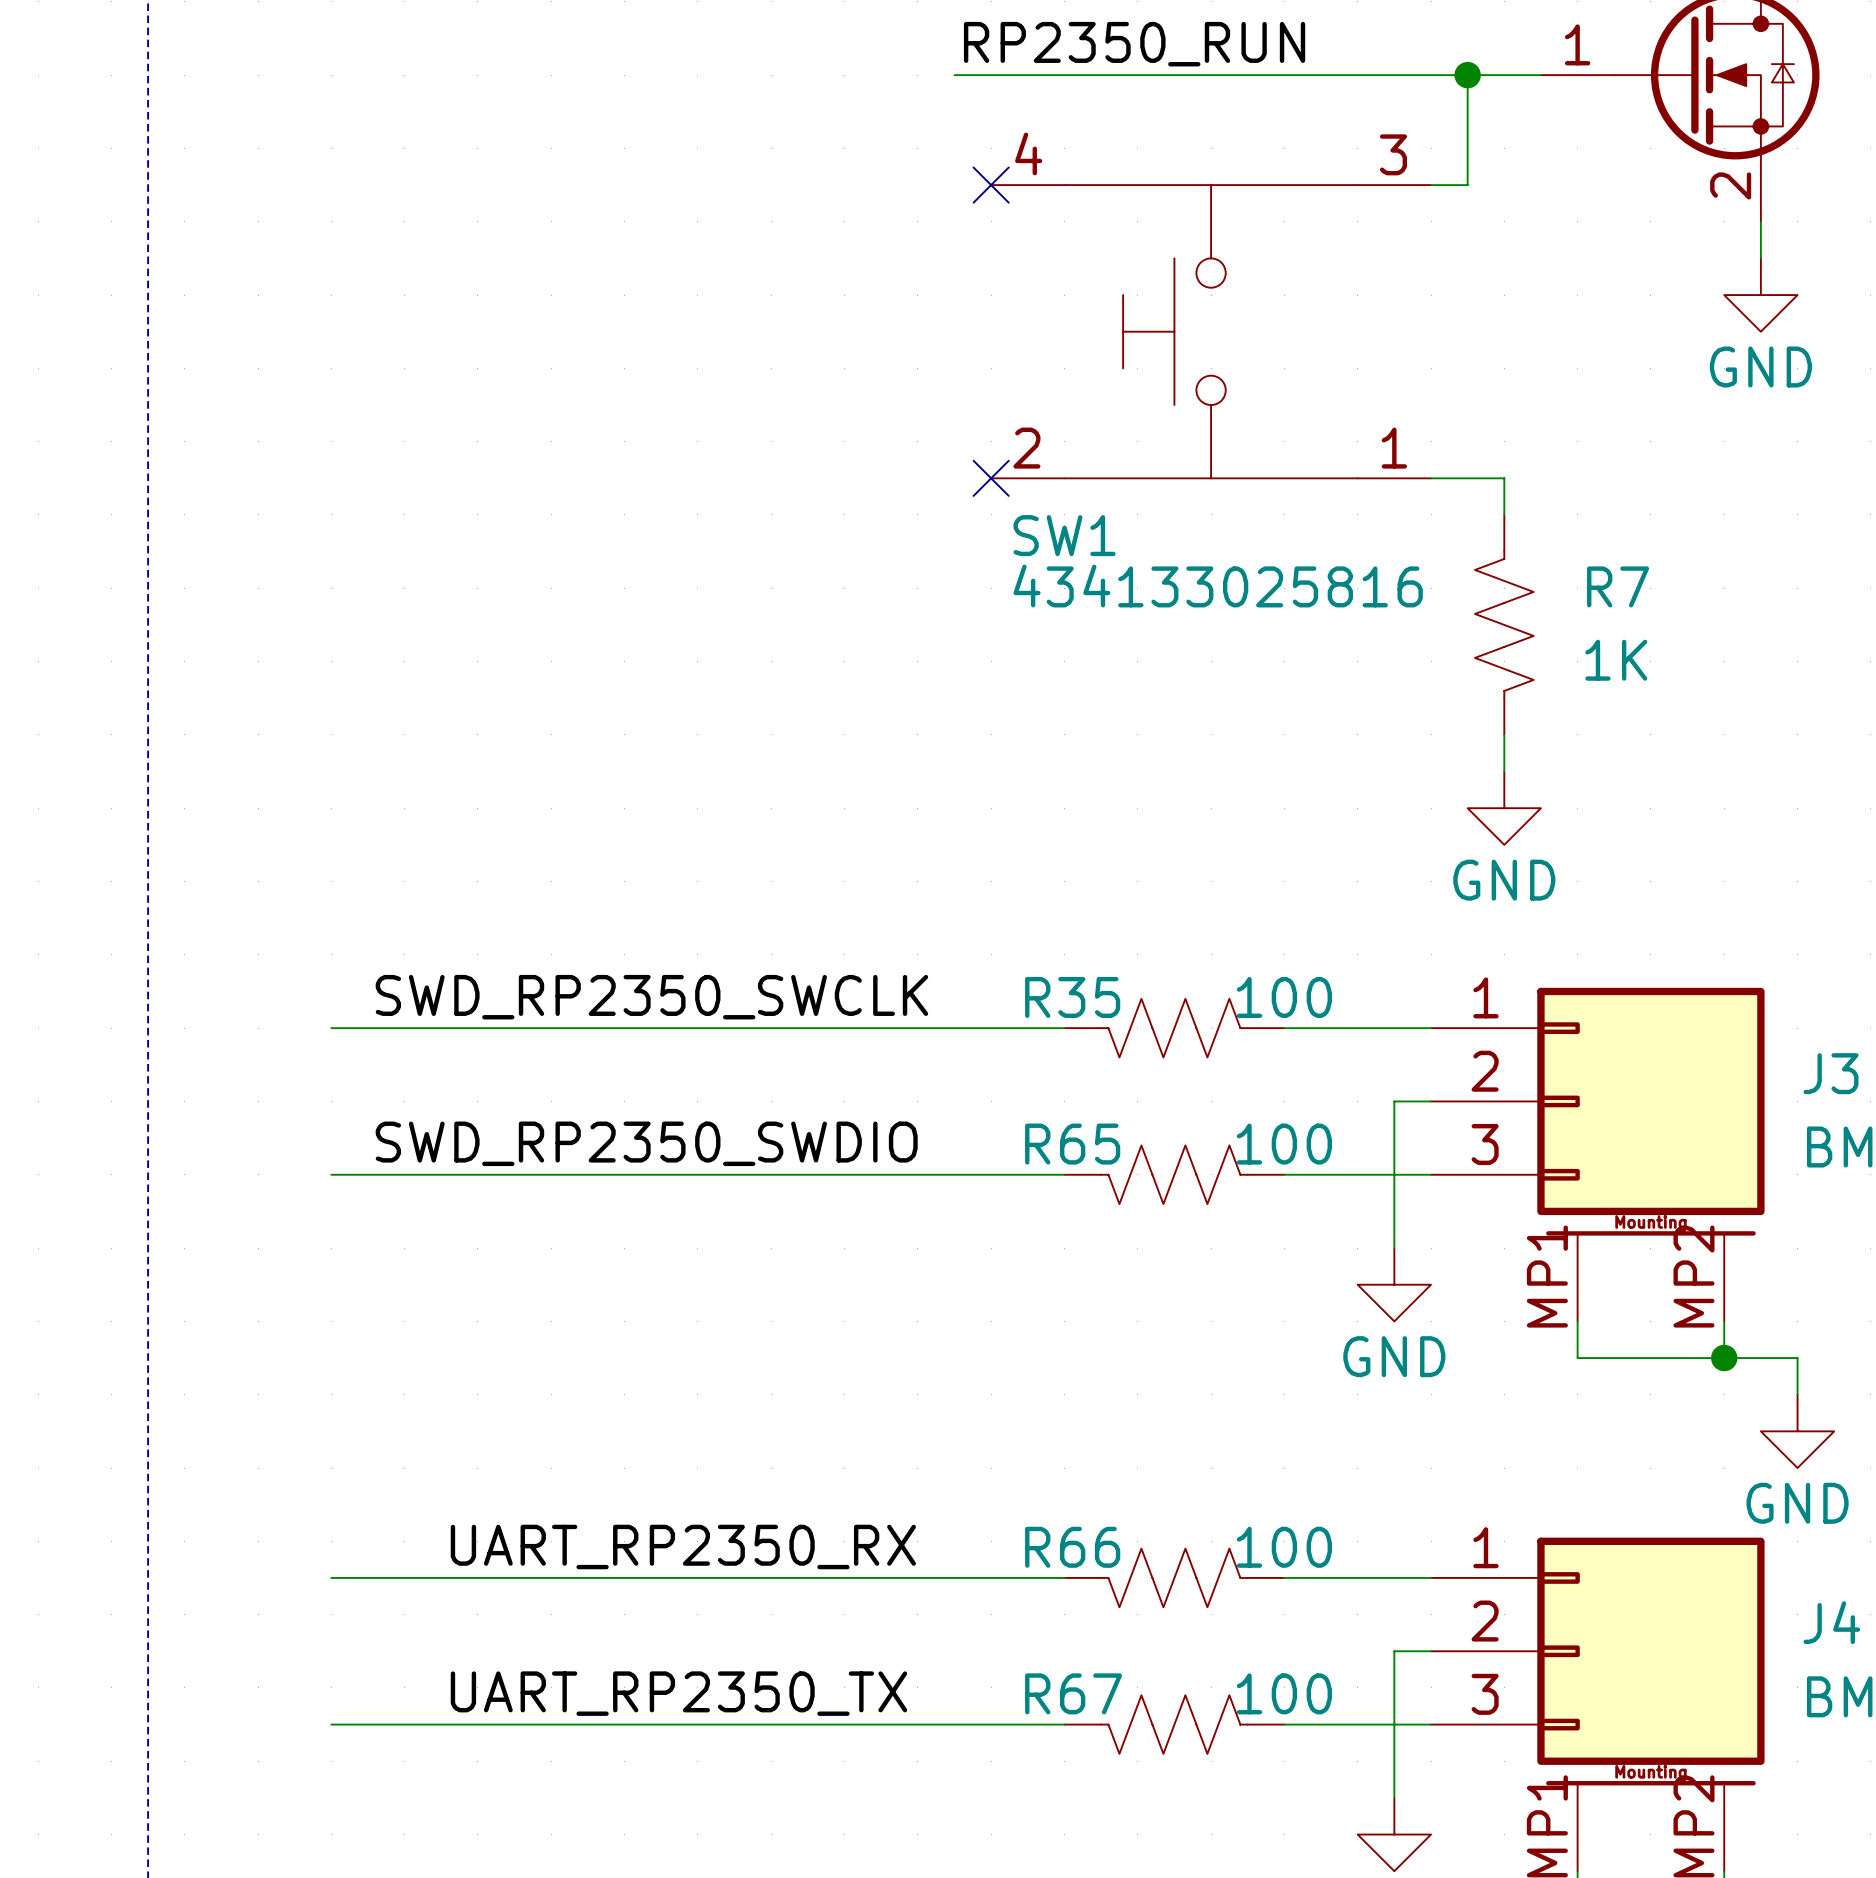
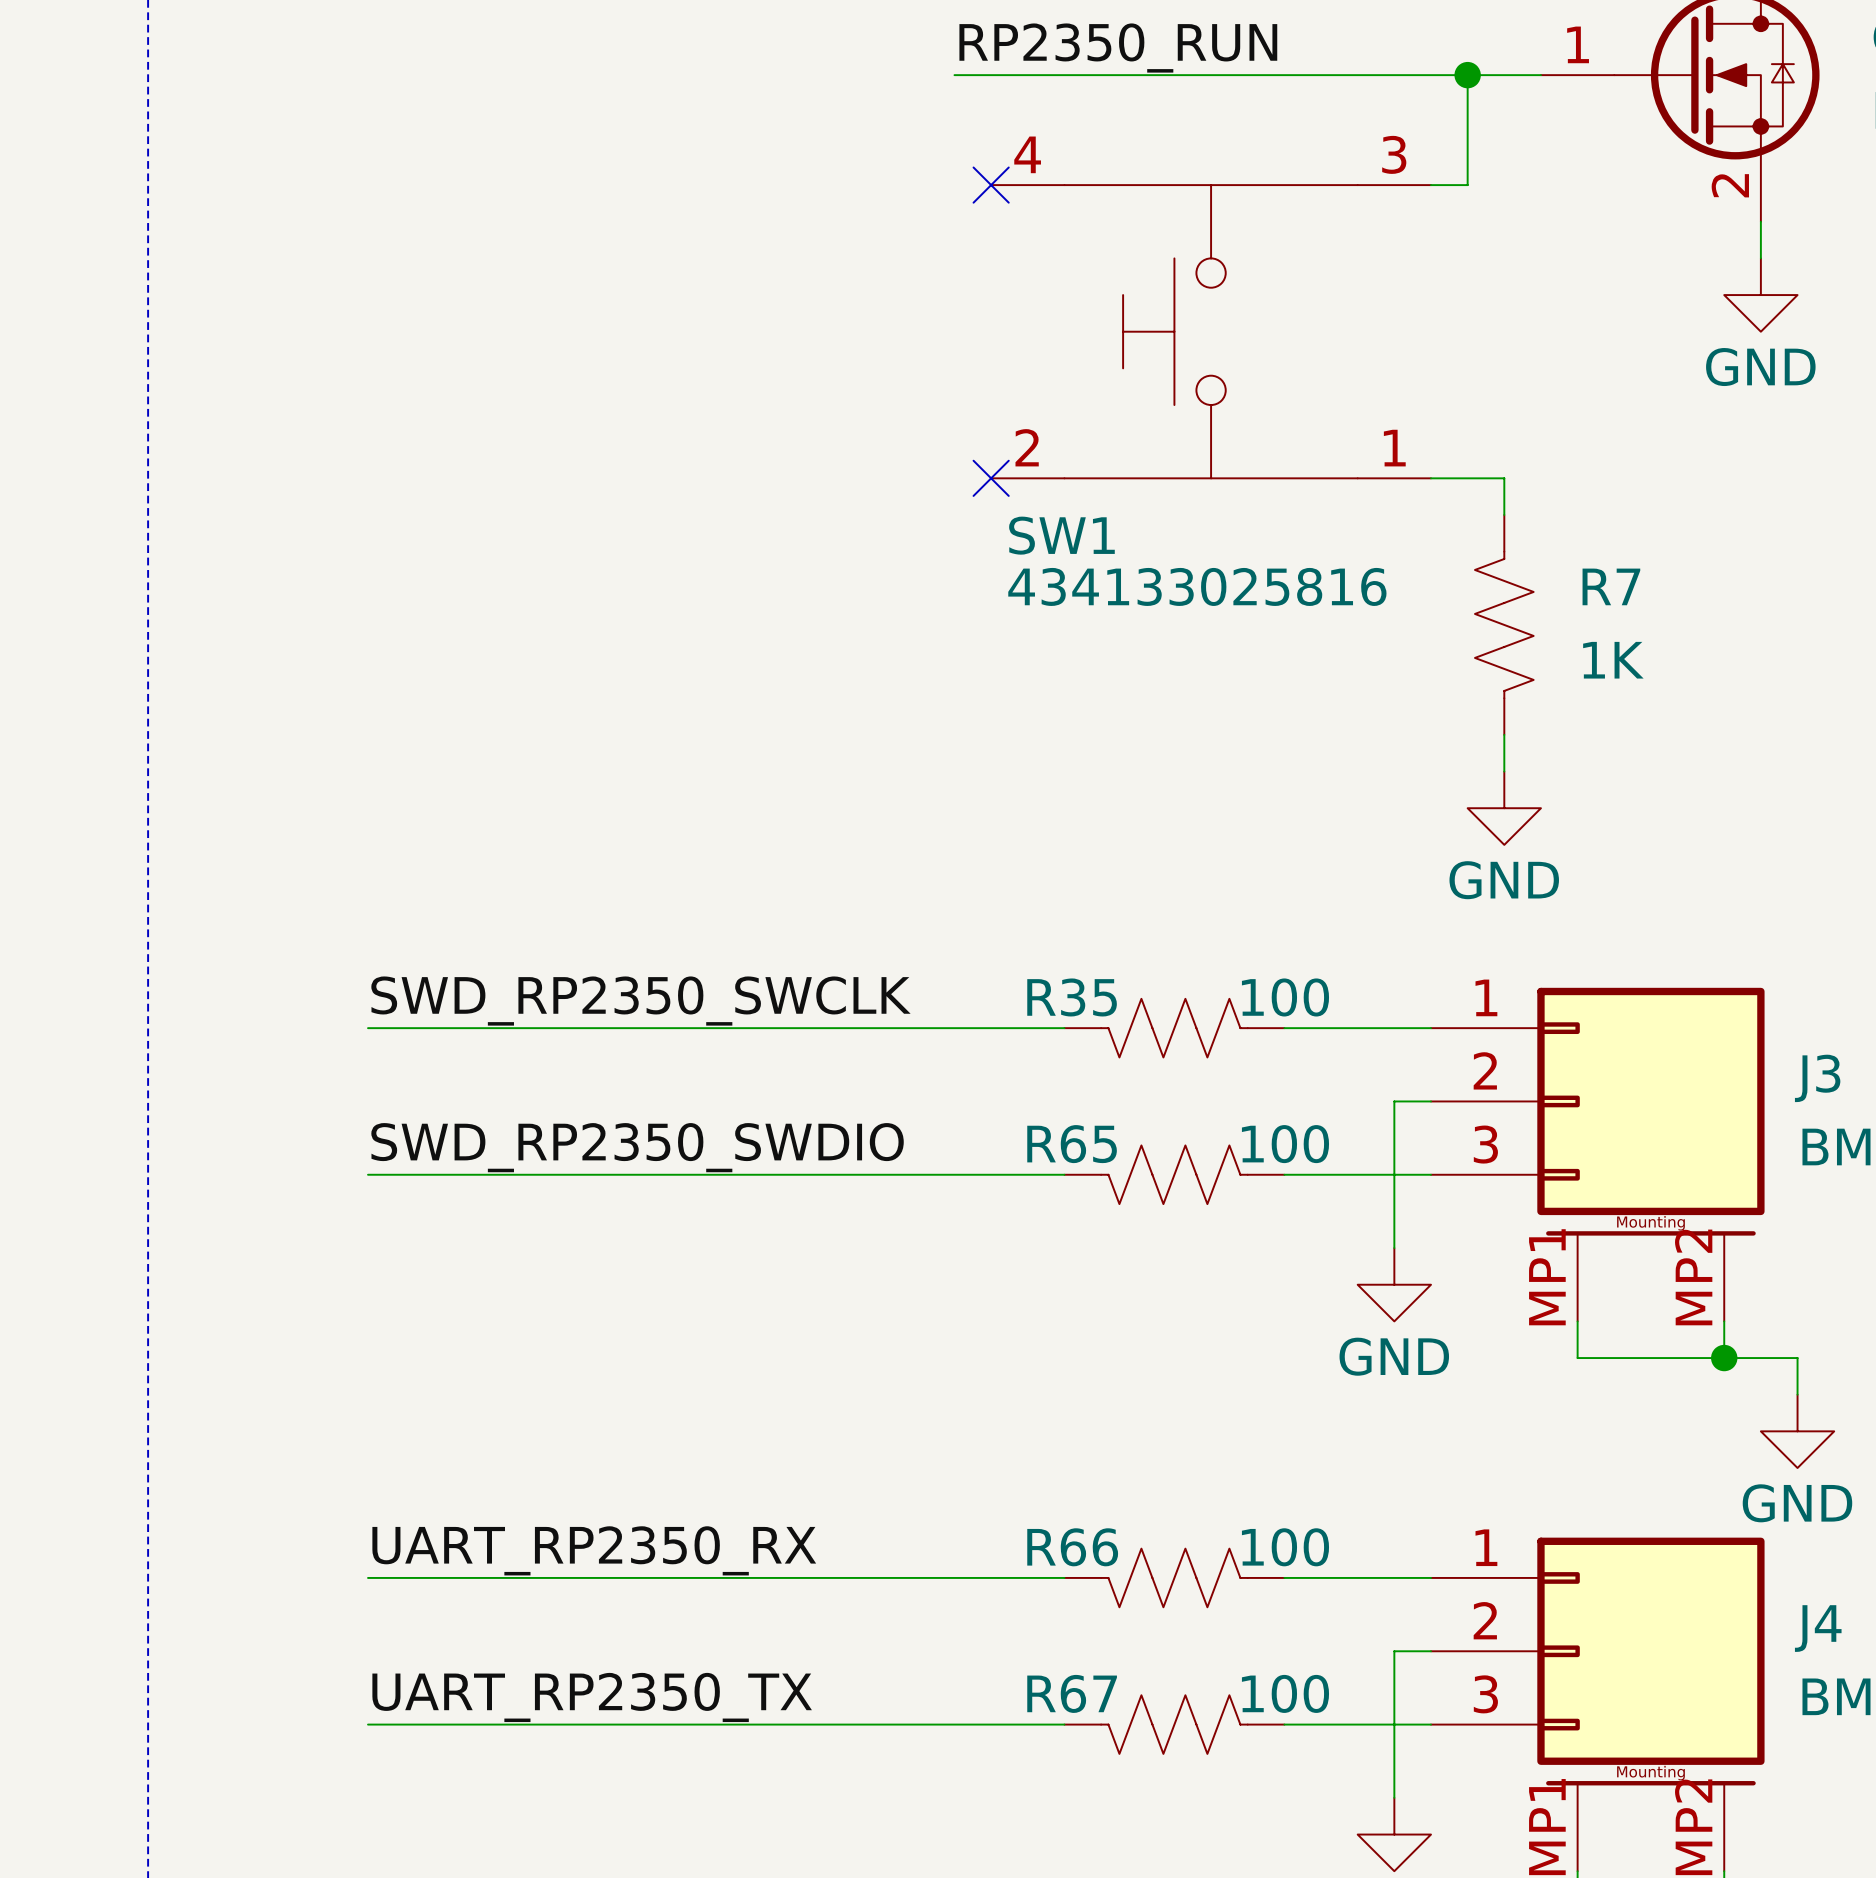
wire: (331, 1028) (368, 1028) -> none
wire: (331, 1174) (368, 1174) -> none
label position: UART_RP2350_RX (683, 1547) -> UART_RP2350_RX (594, 1550)
wire: (331, 1577) (368, 1577) -> none
label position: UART_RP2350_TX (678, 1693) -> UART_RP2350_TX (592, 1697)
wire: (331, 1724) (368, 1724) -> none

